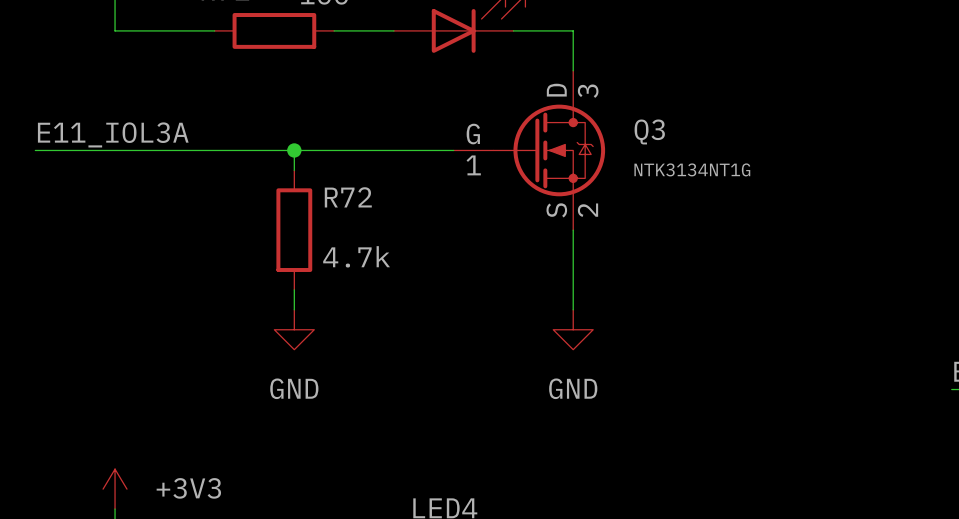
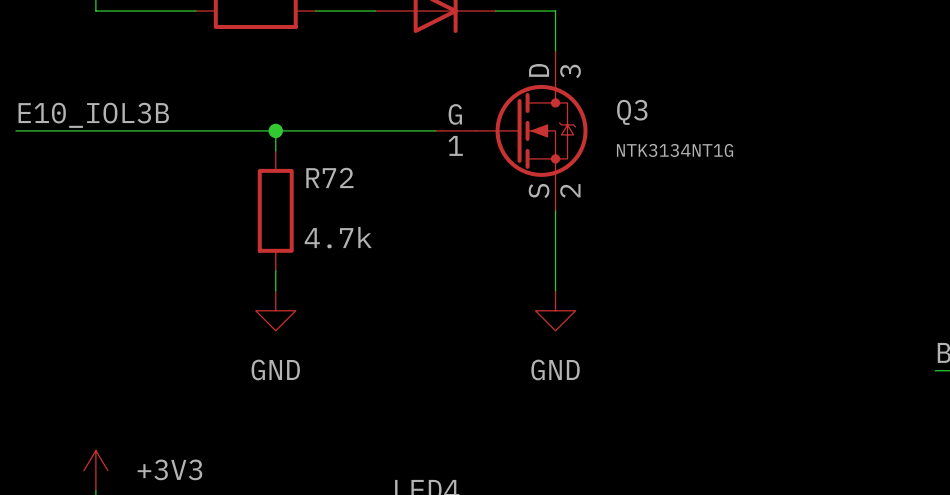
label: E11_IOL3A (113, 134) -> E10_IOL3B (93, 115)

